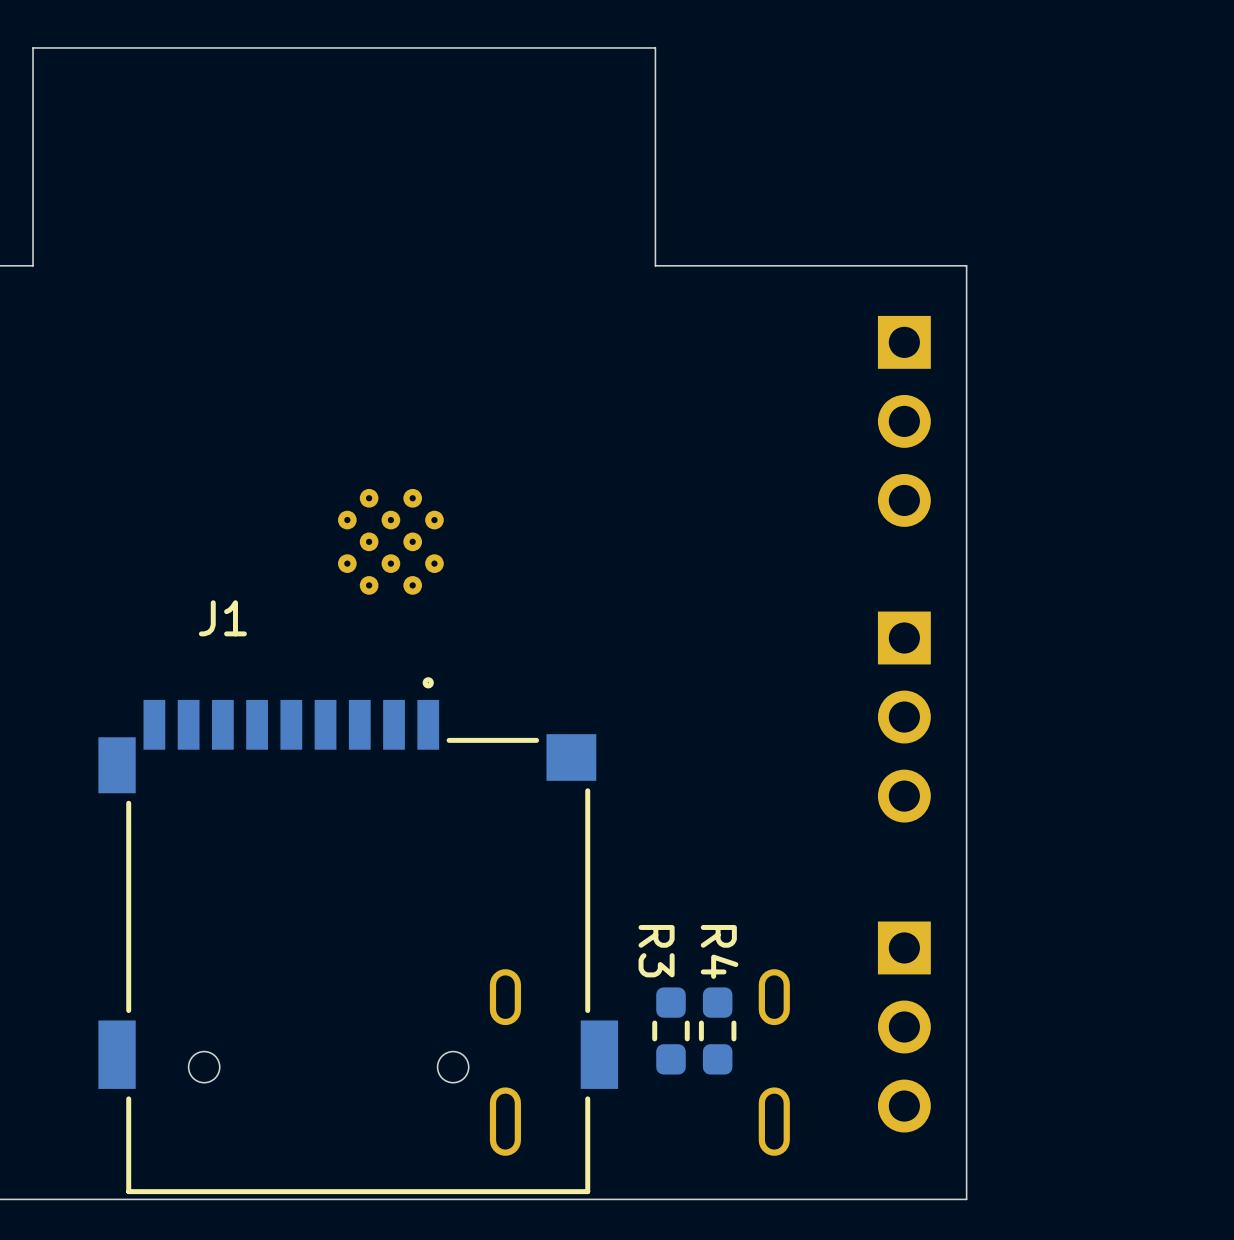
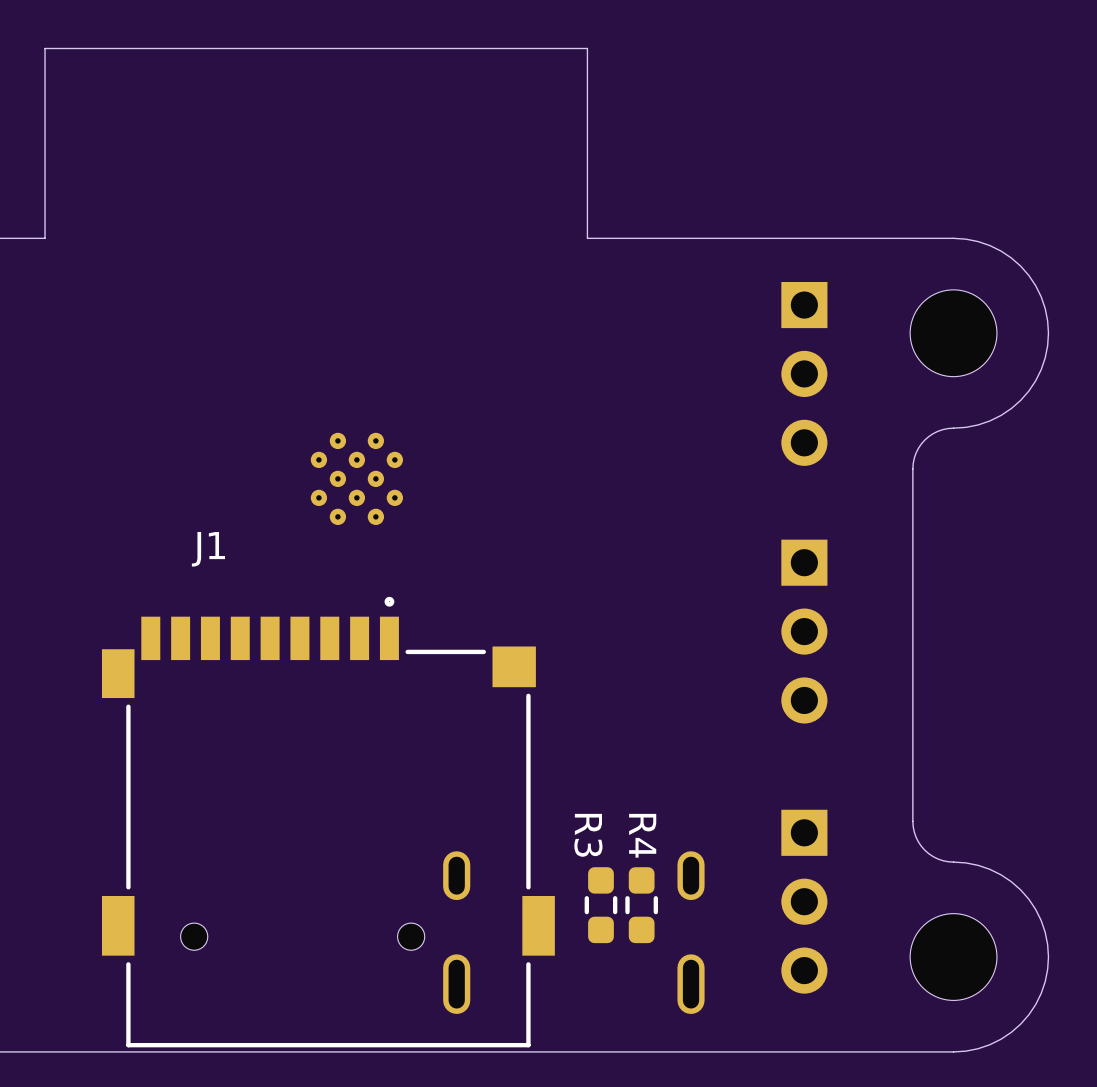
board edge: (966, 265) (966, 1199) -> (858, 238) (965, 239) (989, 245) (1001, 251) (1020, 266) (1035, 285) (1045, 308) (1048, 333) (1045, 357) (1041, 369) (1035, 380) (1020, 400) (1001, 415) (989, 420) (965, 427) (943, 429) (933, 433) (918, 448) (912, 468) (914, 831) (921, 846) (933, 856) (943, 860) (965, 862) (989, 869) (1011, 881) (1028, 899) (1035, 909) (1045, 932) (1048, 957) (1045, 981) (1035, 1004) (1020, 1024) (1001, 1039) (989, 1044) (978, 1048) (953, 1051) (858, 1051)
part: none -> (953, 333)
part: none -> (953, 957)

